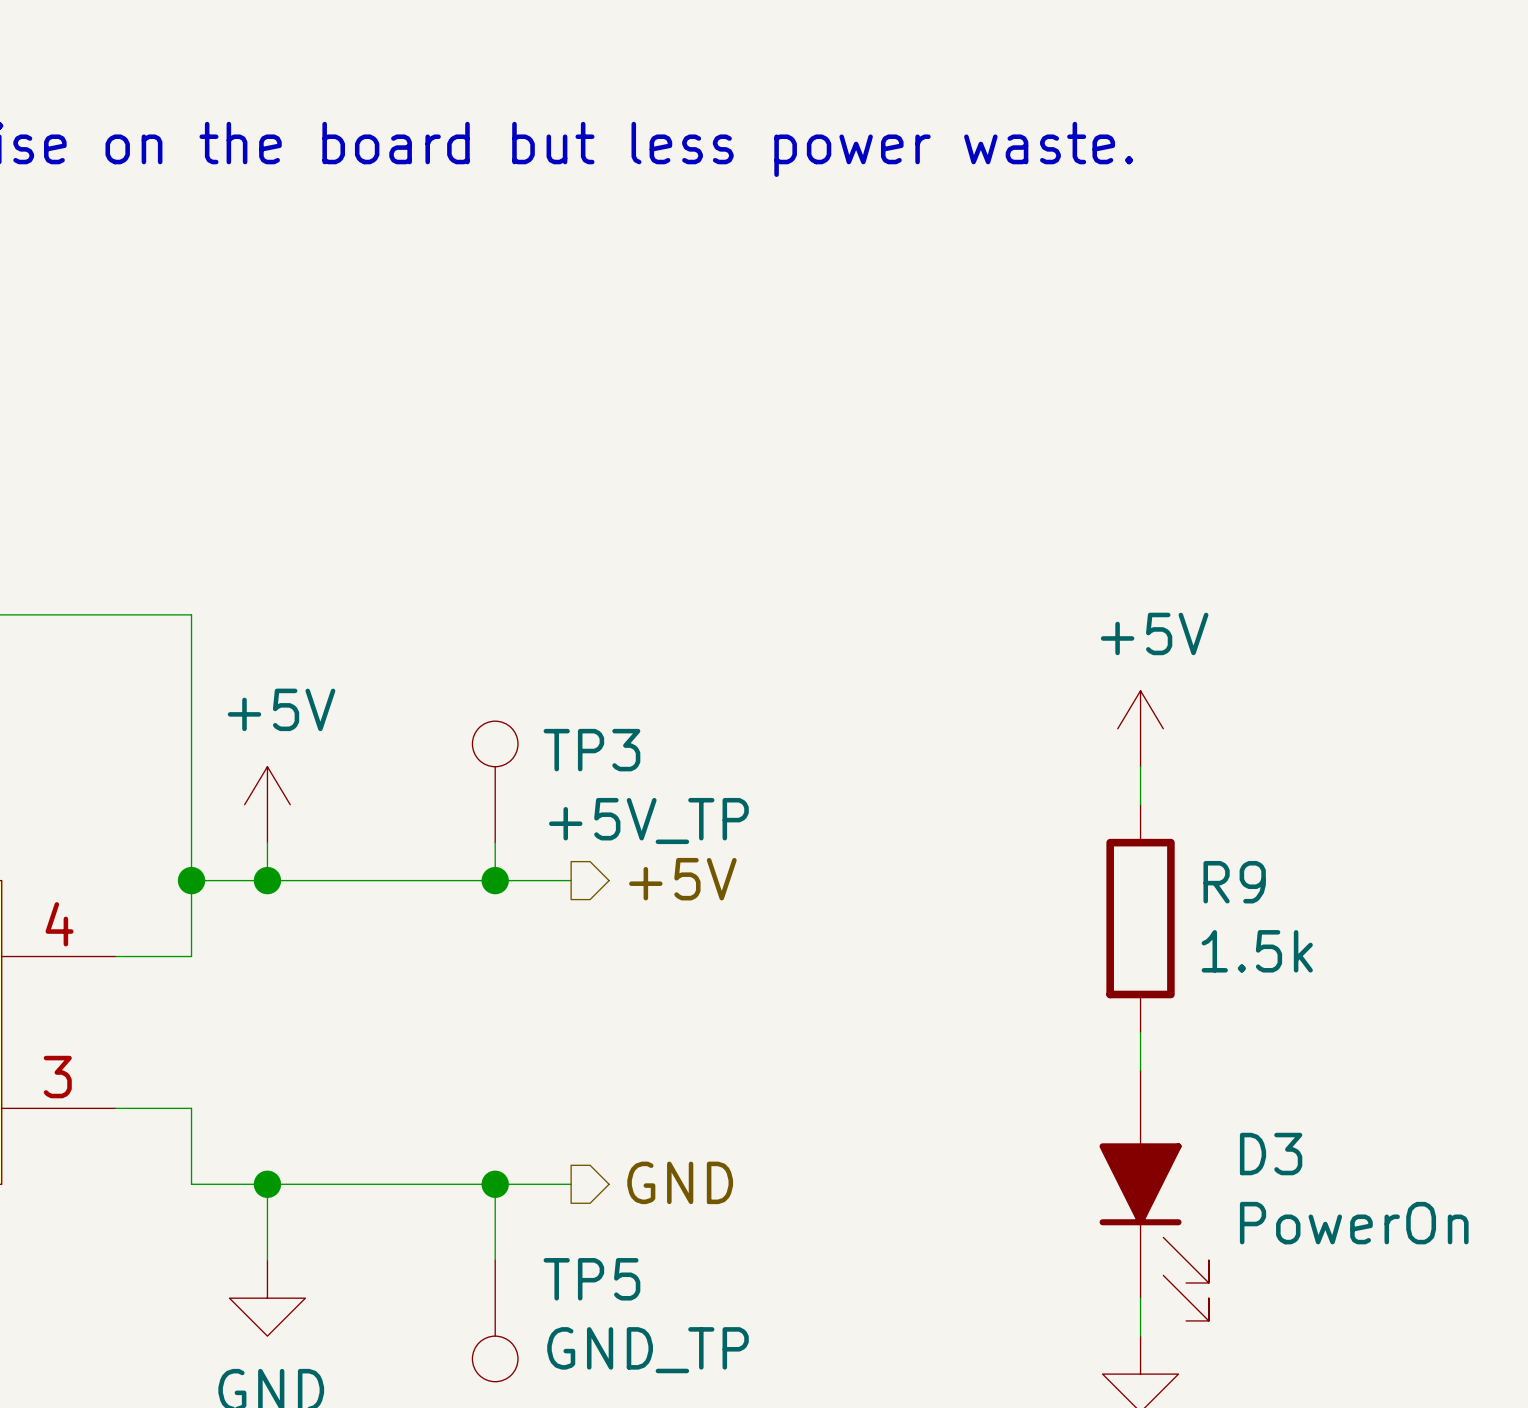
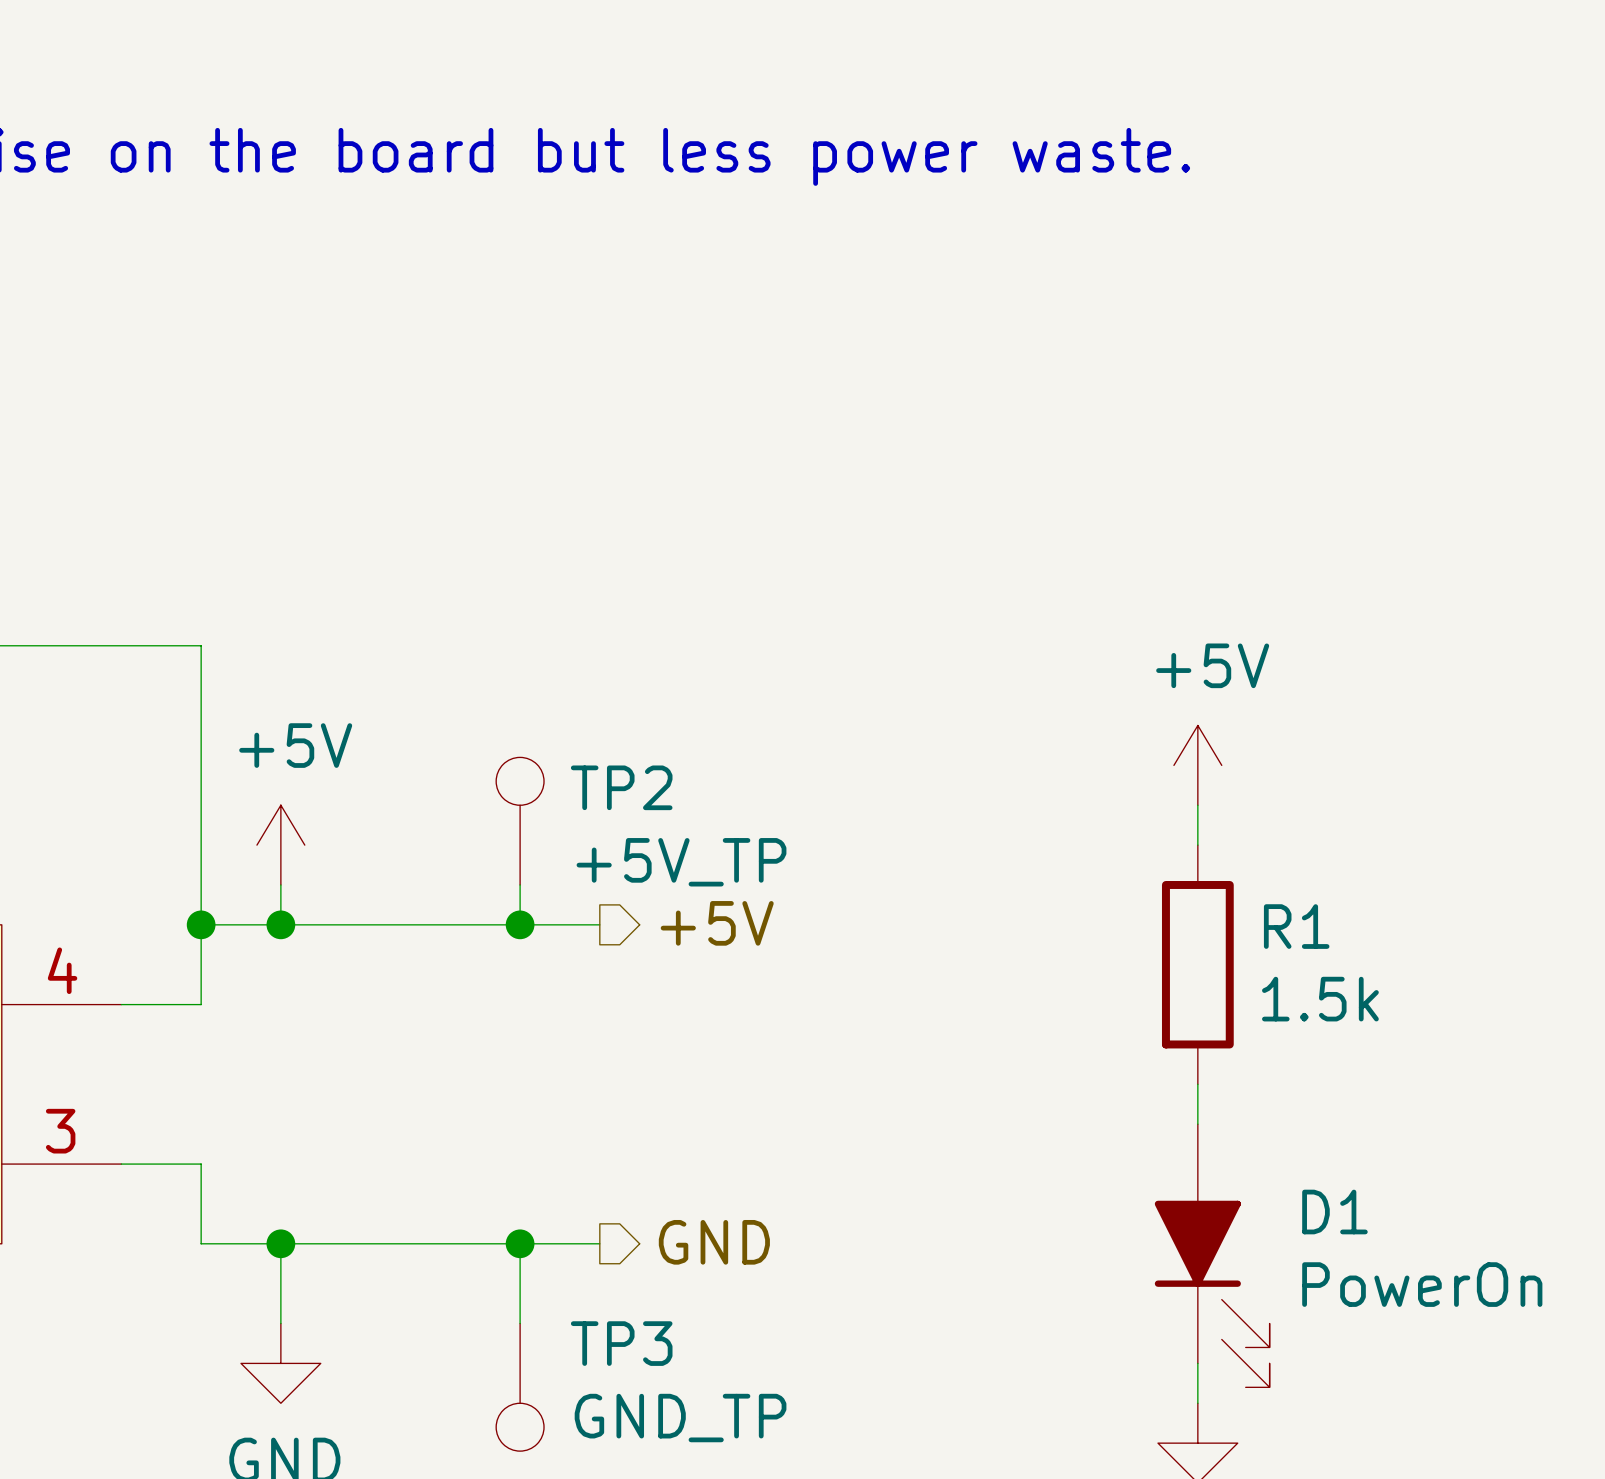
TP3 name: TP3 (591, 750) -> TP2 (621, 787)
R9 name: R9 (1234, 882) -> R1 (1296, 926)
D3 name: D3 (1271, 1154) -> D1 (1334, 1212)
TP5 name: TP5 (591, 1279) -> TP3 (621, 1343)

